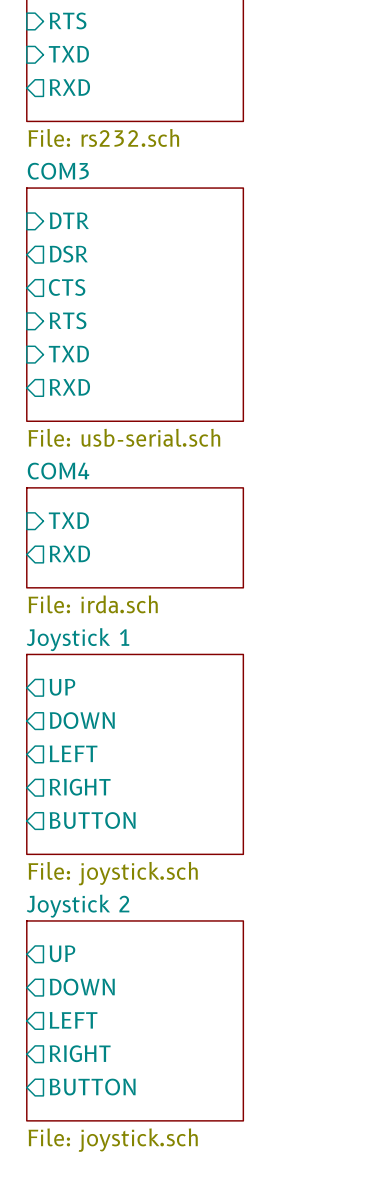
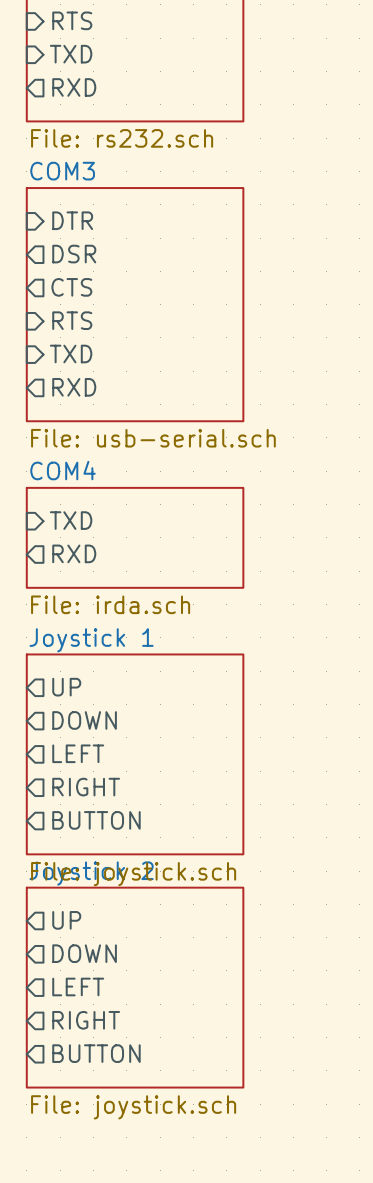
sheet pin: none -> UP (66, 920)
sheet pin: UP (62, 953) -> DOWN (84, 953)
sheet pin: DOWN (82, 987) -> LEFT (78, 986)
sheet pin: LEFT (73, 1020) -> RIGHT (86, 1020)
sheet Joystick 2 position: (135, 1020) -> (135, 987)
sheet pin: RIGHT (80, 1053) -> BUTTON (96, 1053)
sheet pin: BUTTON (92, 1087) -> none

